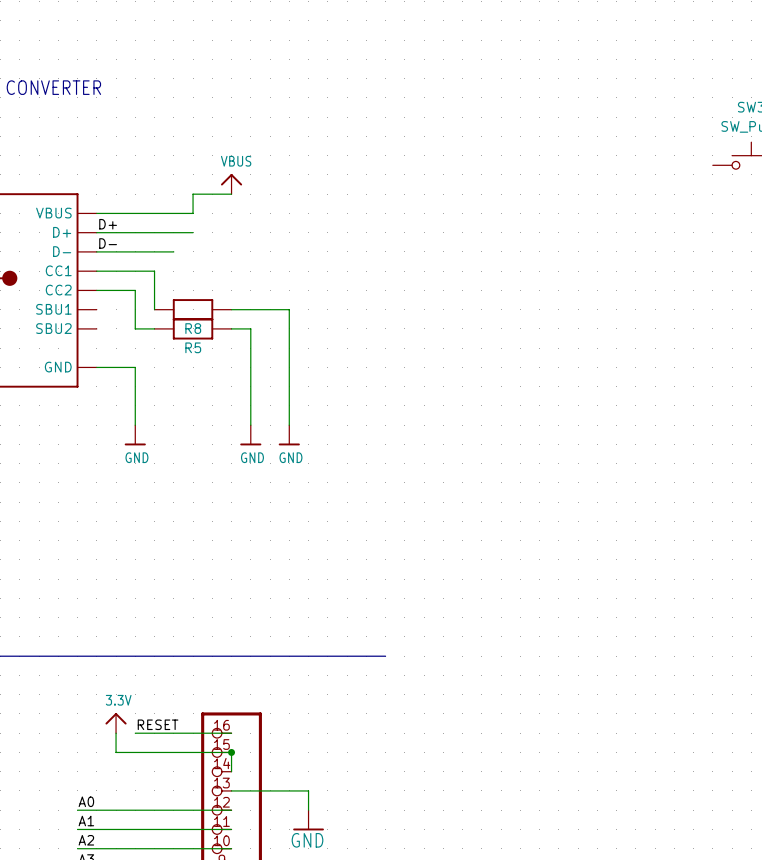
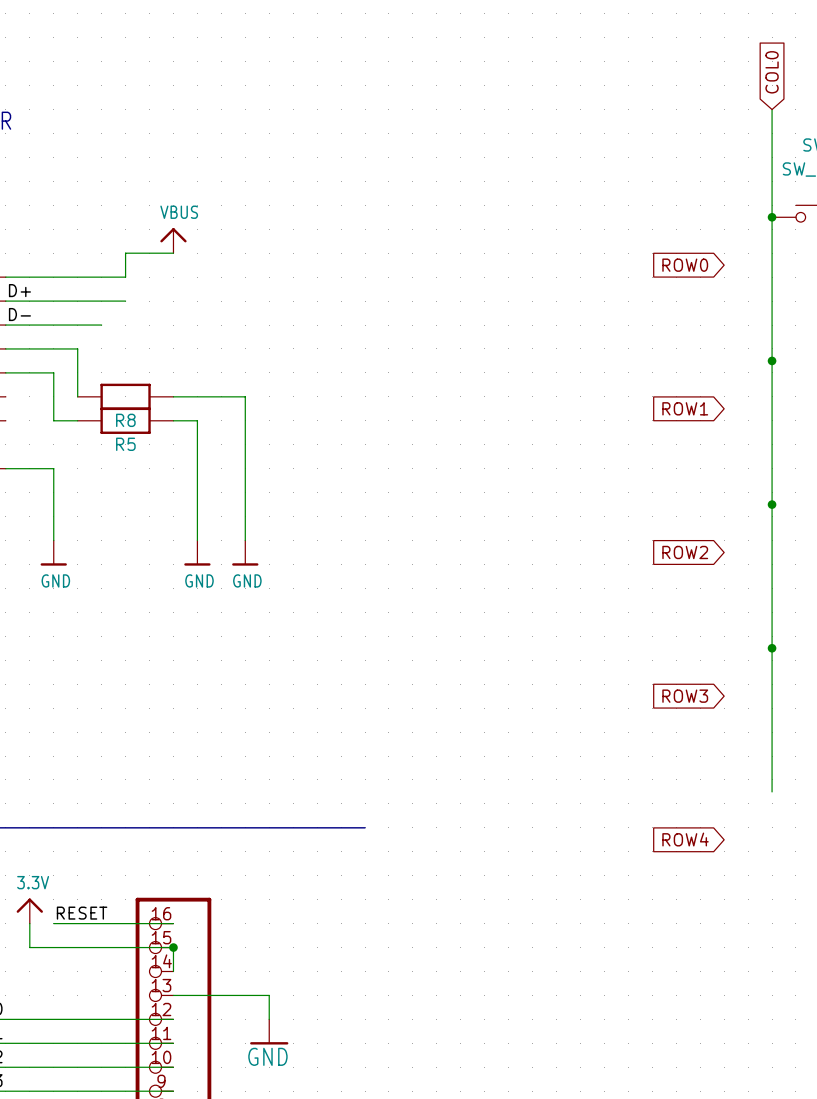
global label: none -> COL0 (772, 72)
wire: none -> (772, 109) (772, 791)
junction: none -> (772, 217)
global label: none -> ROW0 (685, 265)
junction: none -> (772, 360)
global label: none -> ROW1 (685, 408)
junction: none -> (772, 504)
global label: none -> ROW2 (685, 552)
junction: none -> (772, 648)
global label: none -> ROW3 (685, 696)
global label: none -> ROW4 (685, 839)

